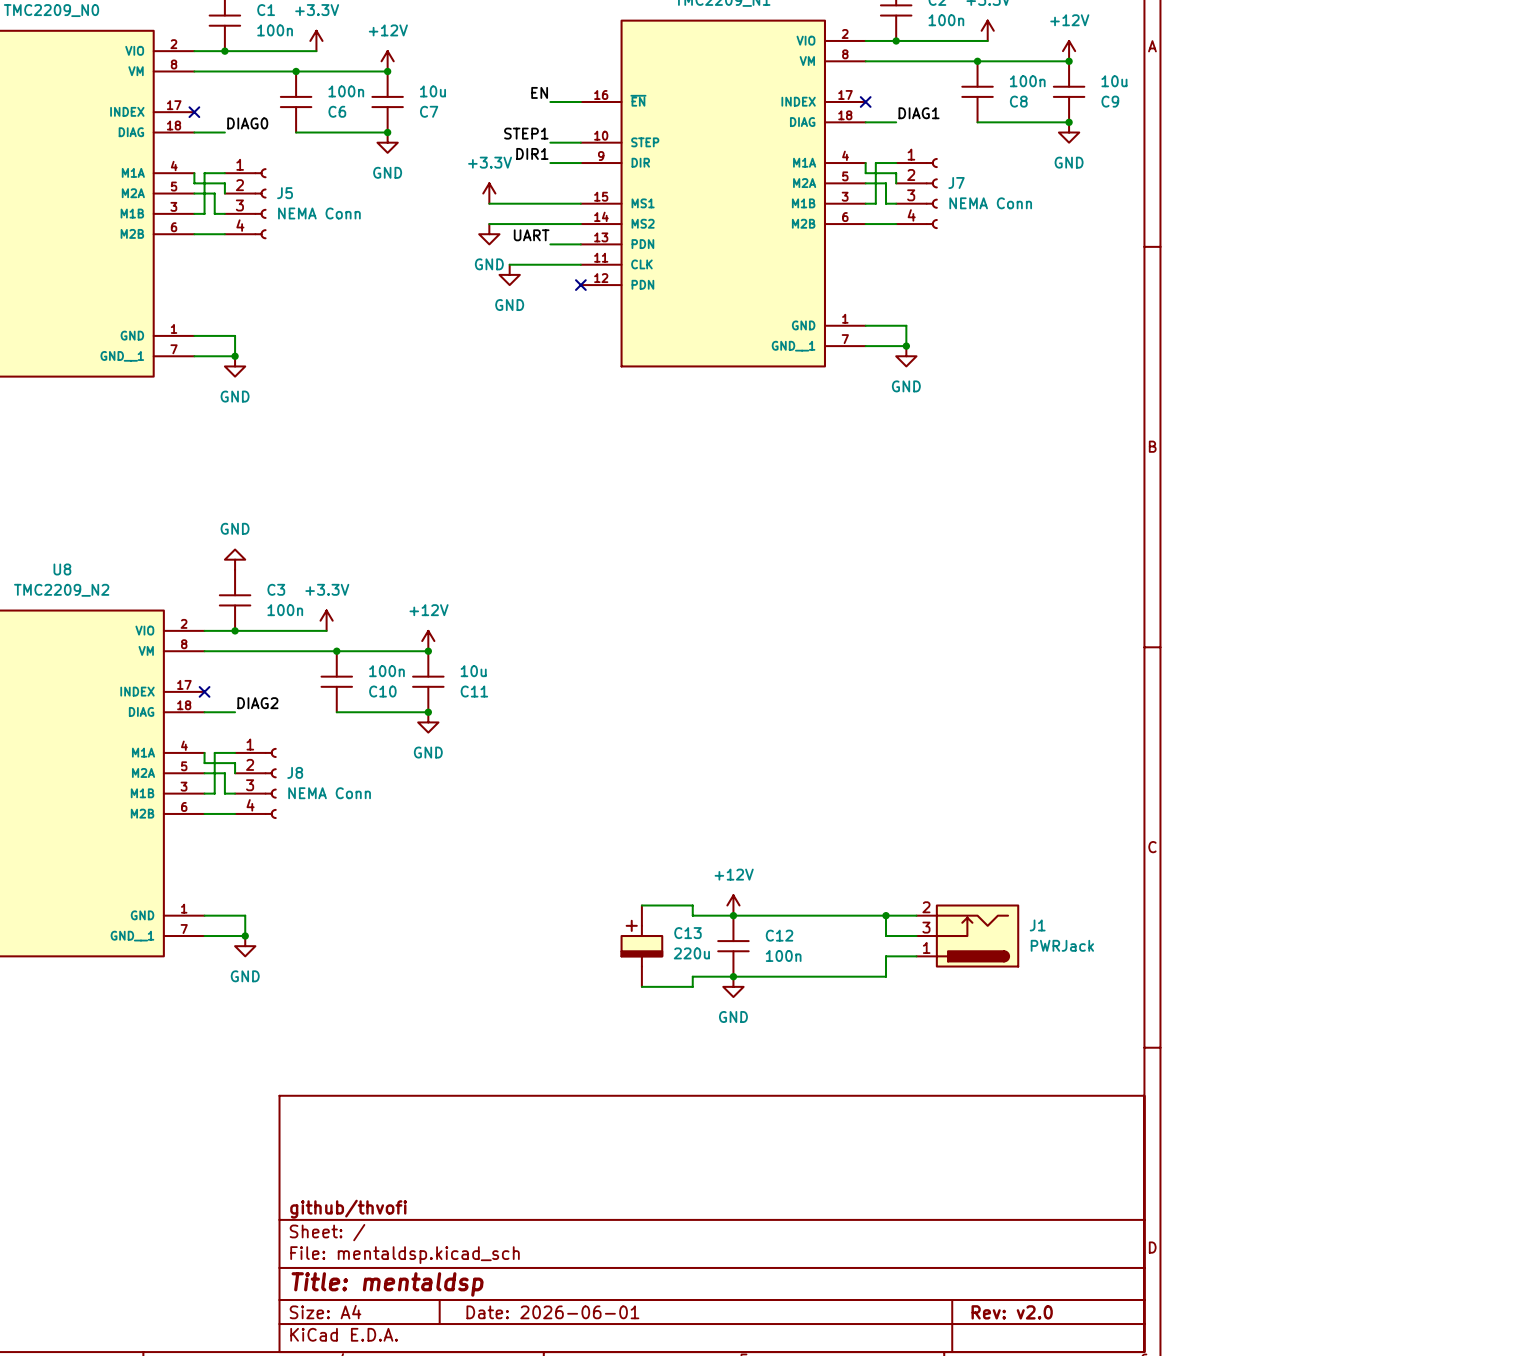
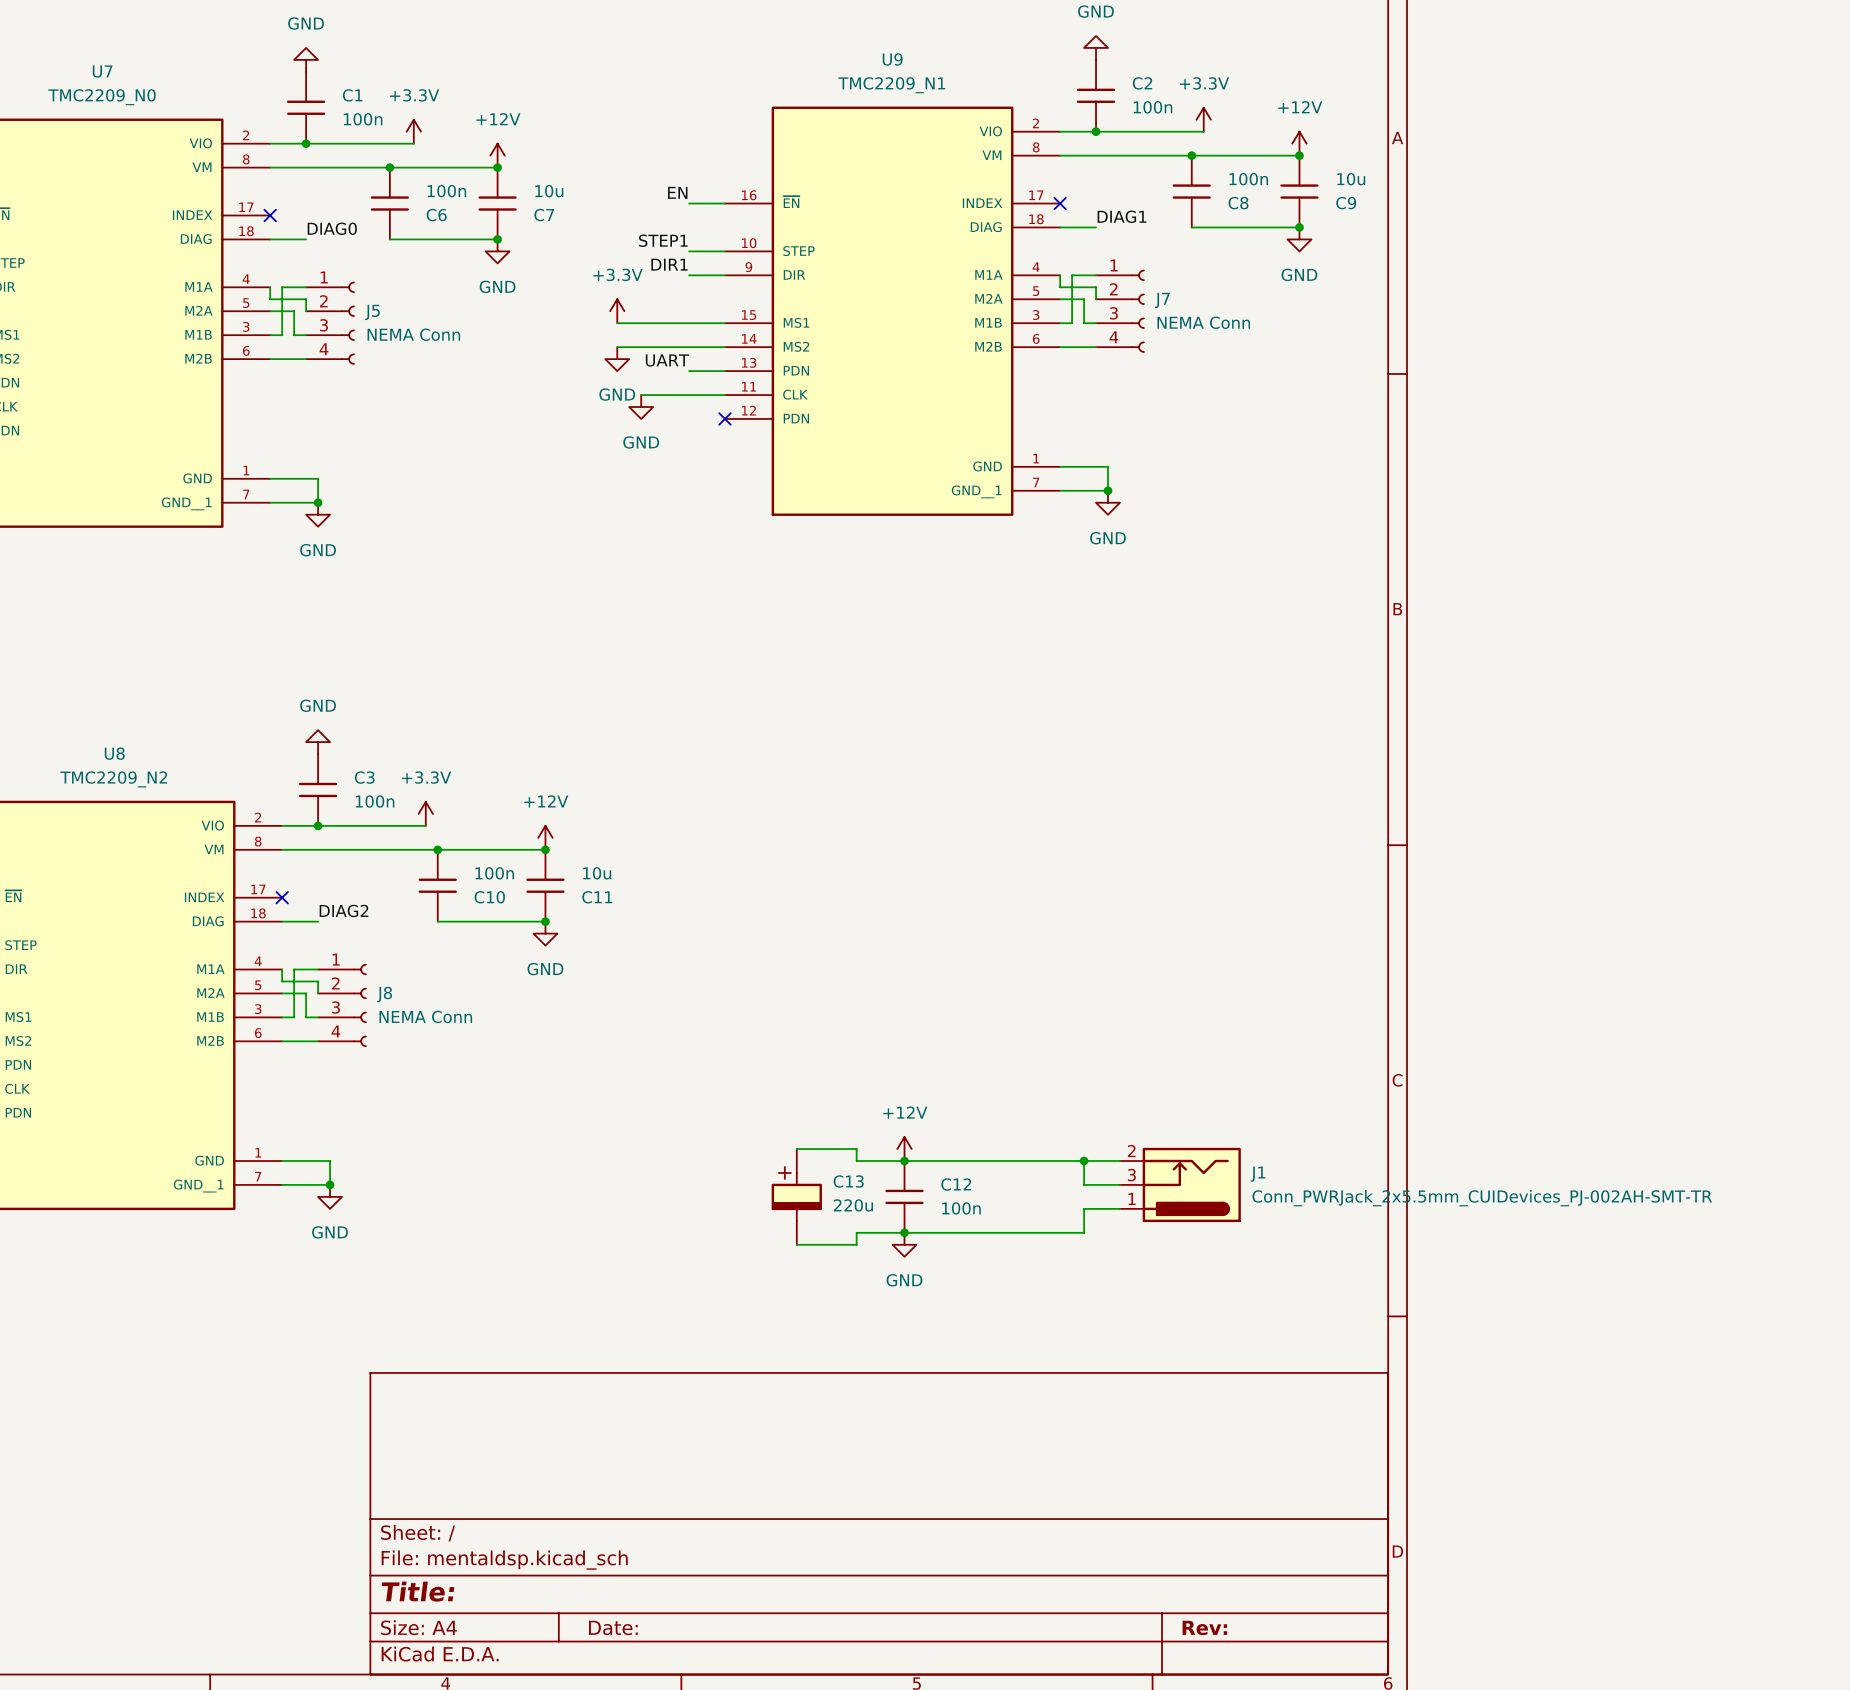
J1 value: PWRJack (1062, 945) -> Conn_PWRJack_2x5.5mm_CUIDevices_PJ-002AH-SMT-TR (1482, 1198)
title block: github/thvofi (348, 1209) -> none
title block: Title: mentaldsp (387, 1284) -> Title: (418, 1591)
title block: Date: 2026-06-01 (552, 1312) -> Date: (613, 1627)
title block: Rev: v2.0 (1012, 1312) -> Rev: (1204, 1627)

